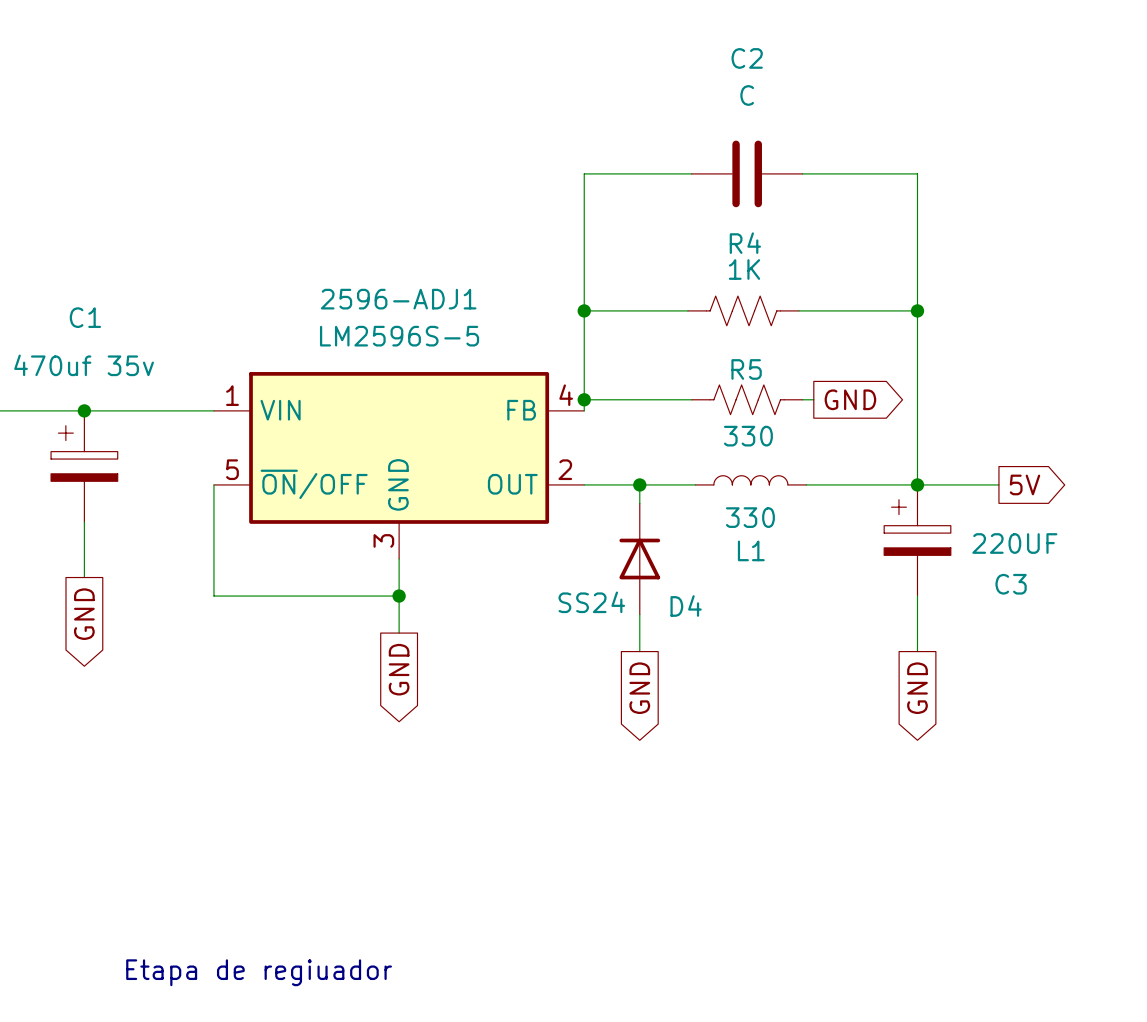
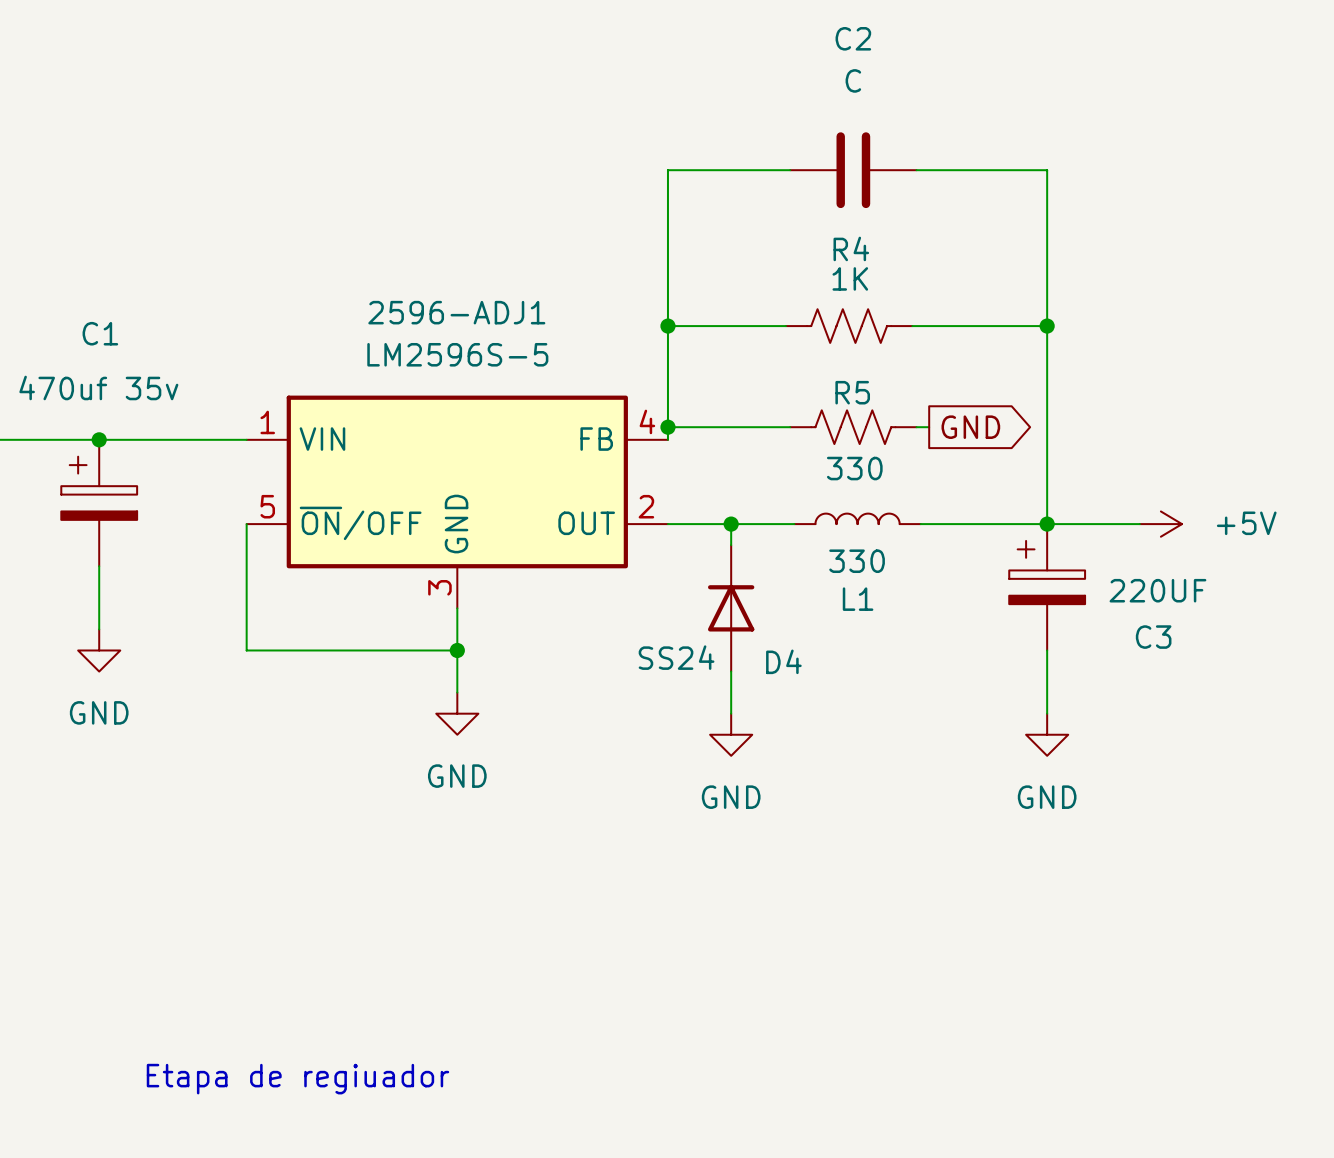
power symbol: none -> +5V (1160, 524)
global label: 5V (1024, 484) -> none
power symbol: none -> GND (99, 650)
global label: GND (84, 614) -> none
power symbol: none -> GND (457, 713)
global label: GND (399, 669) -> none
power symbol: none -> GND (731, 734)
power symbol: none -> GND (1047, 734)
global label: GND (639, 688) -> none
global label: GND (917, 688) -> none

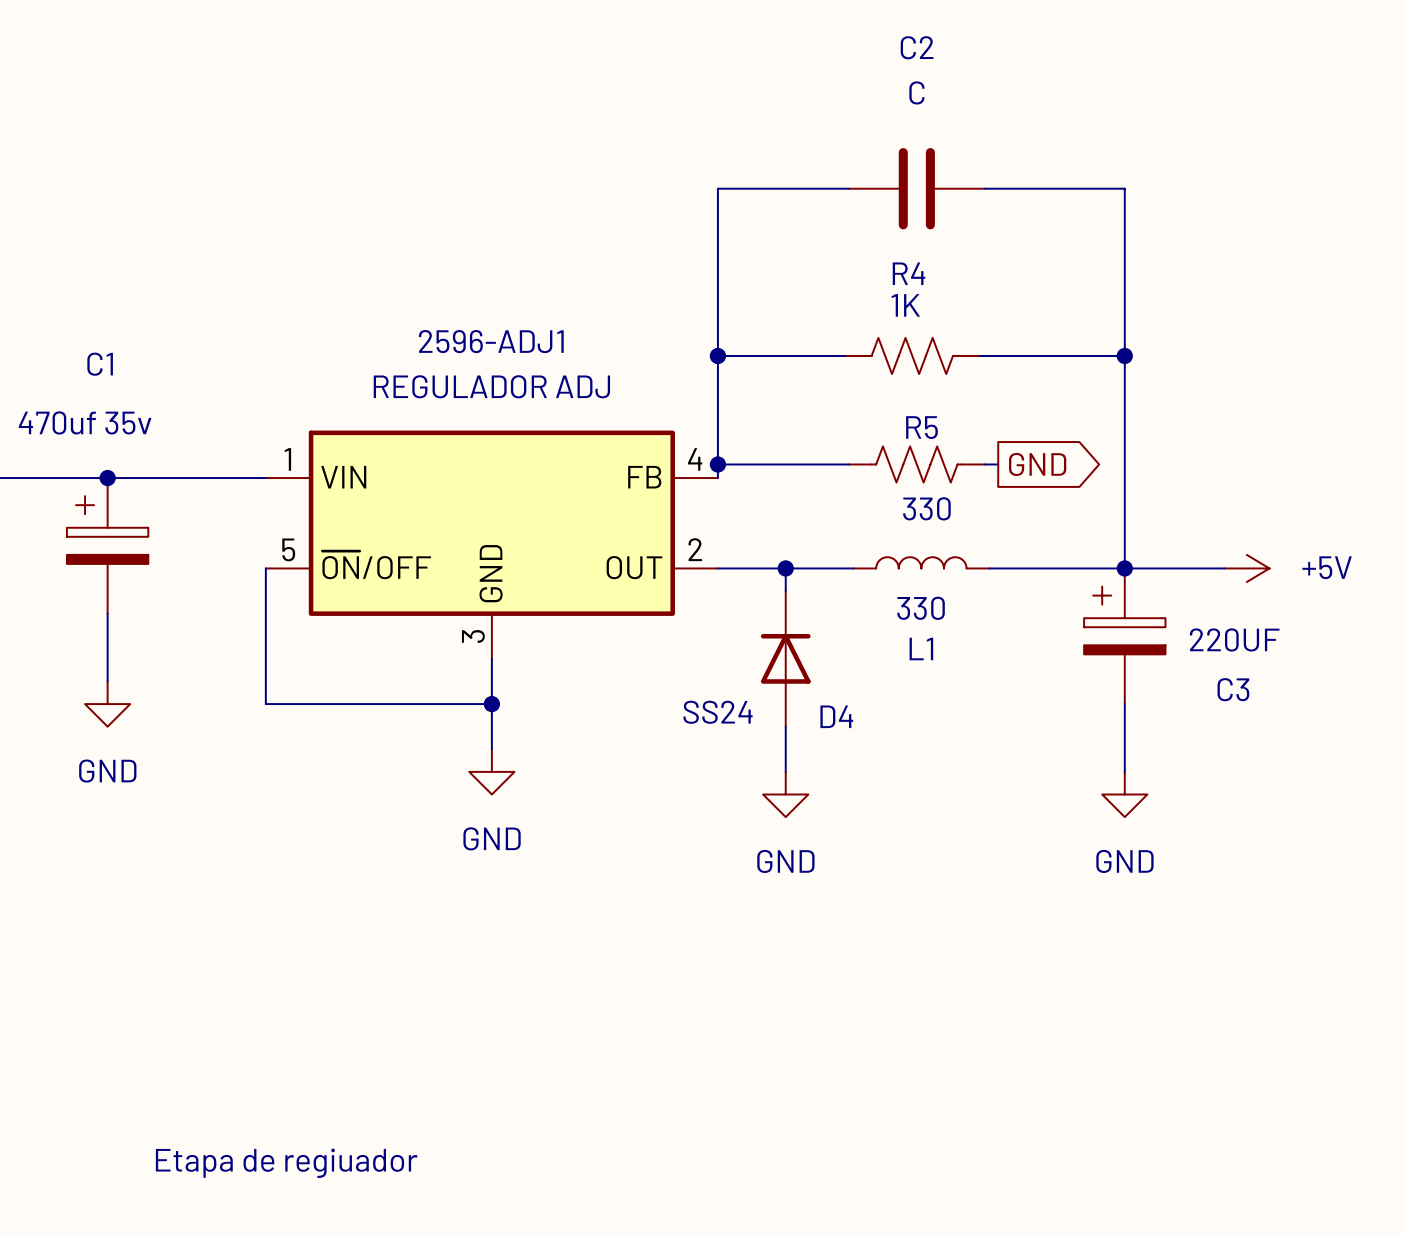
2596-ADJ1 value: LM2596S-5 (457, 354) -> REGULADOR ADJ (491, 386)

